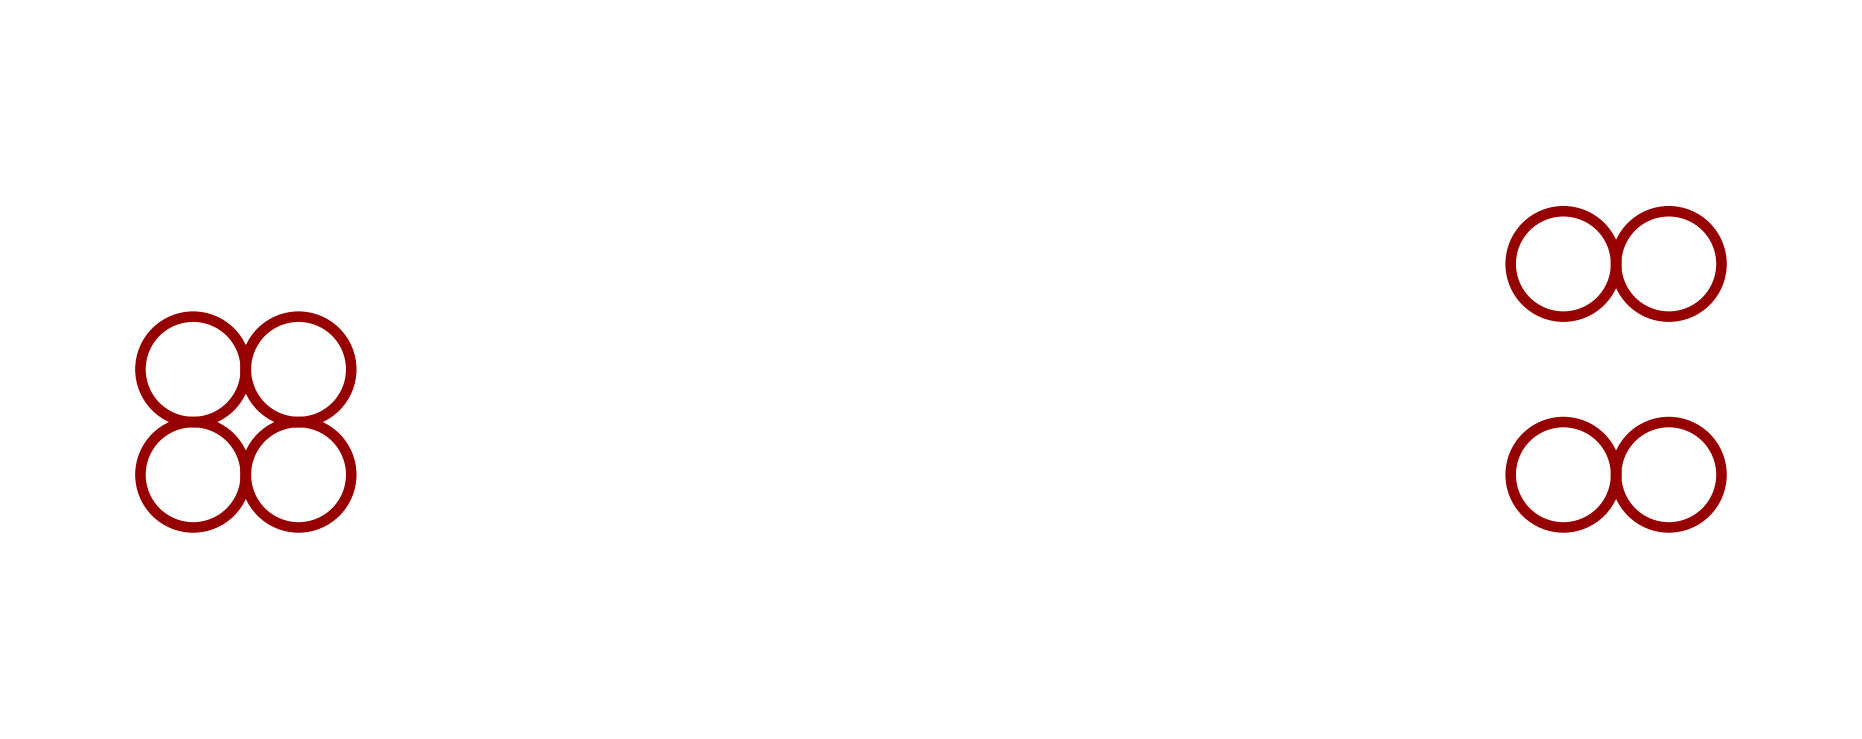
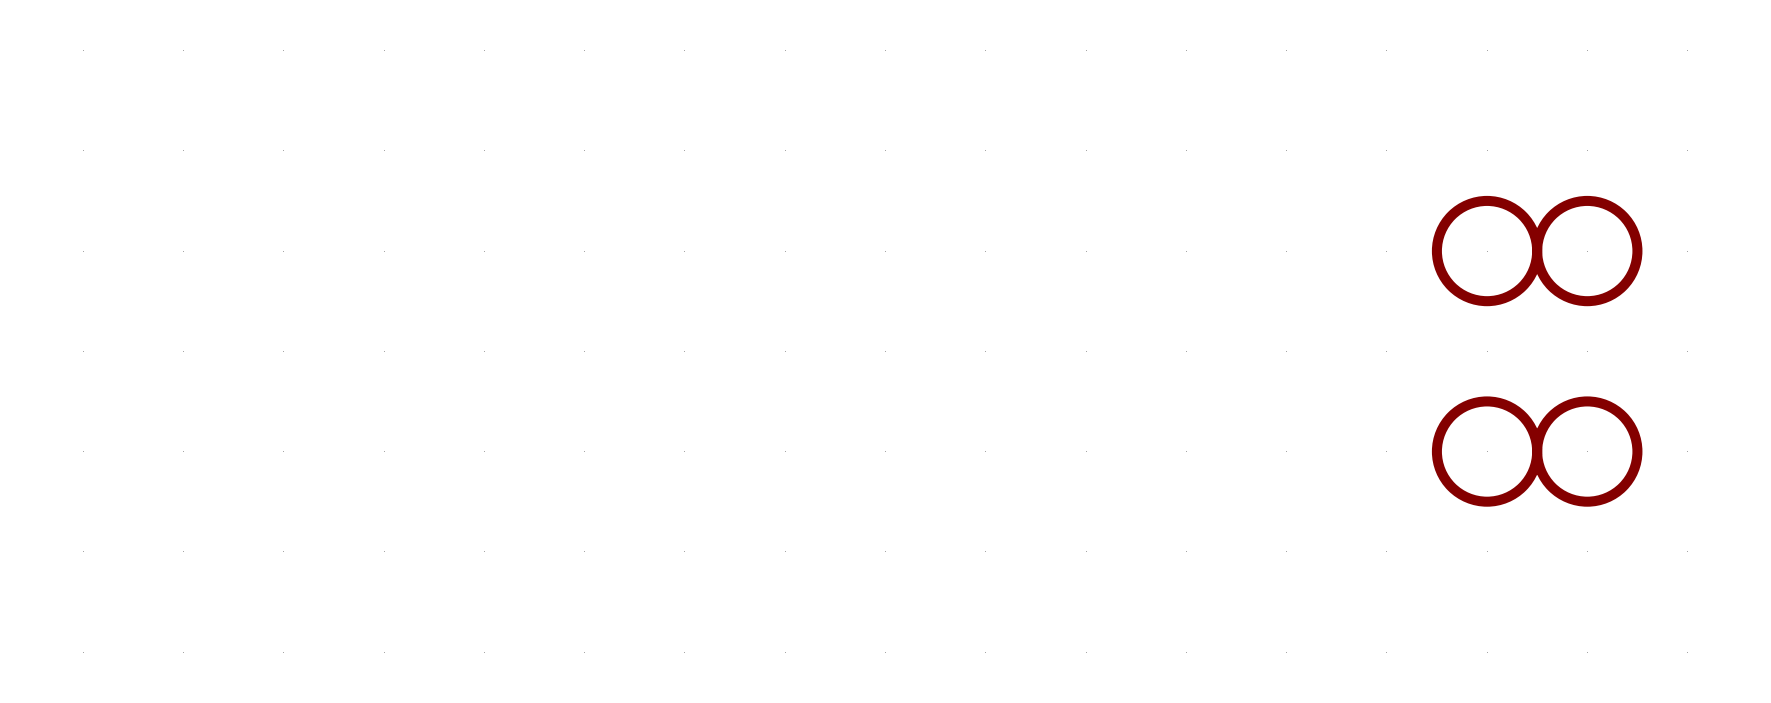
part: (193, 369) -> none
part: (298, 369) -> none
part: (193, 474) -> none
part: (298, 474) -> none

